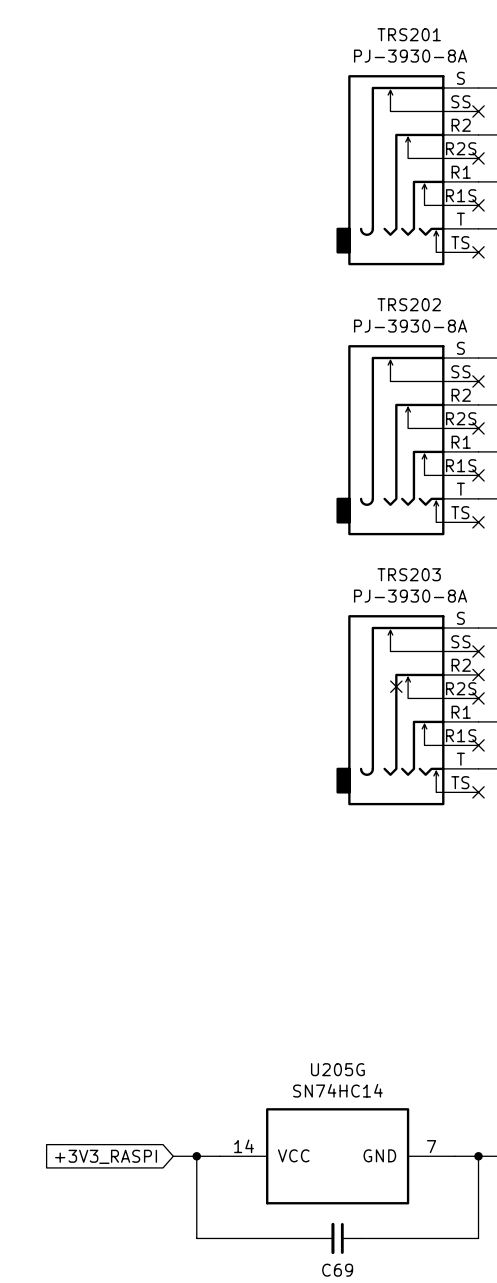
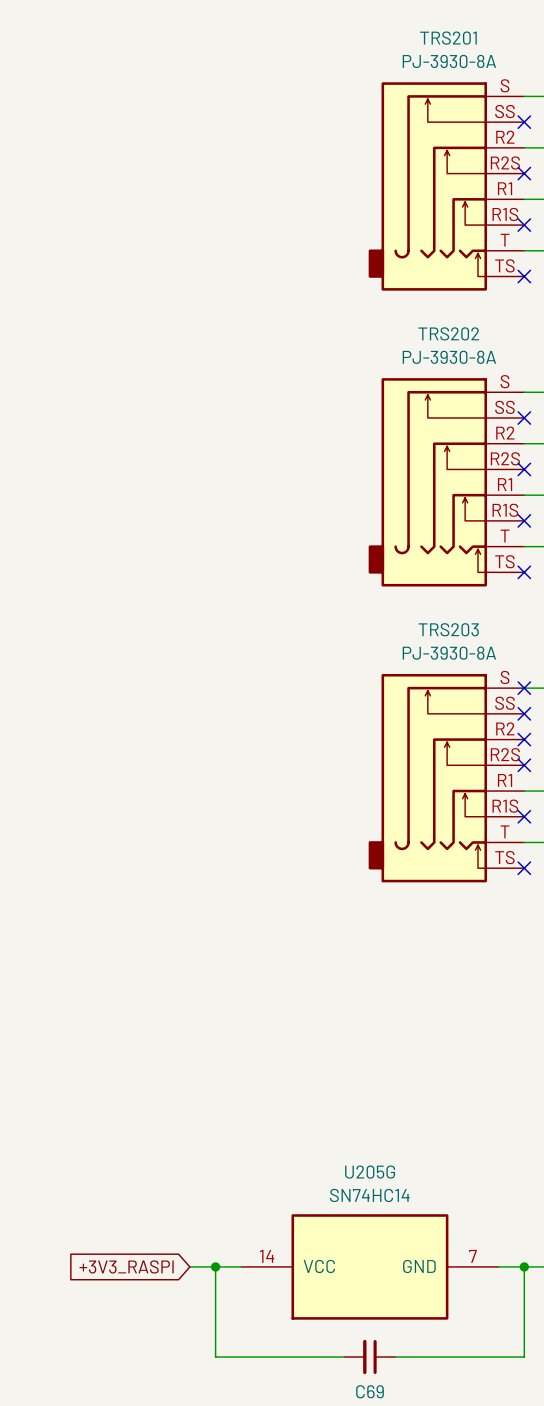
no-connect mark: none -> (524, 688)
no-connect mark: (396, 686) -> none

